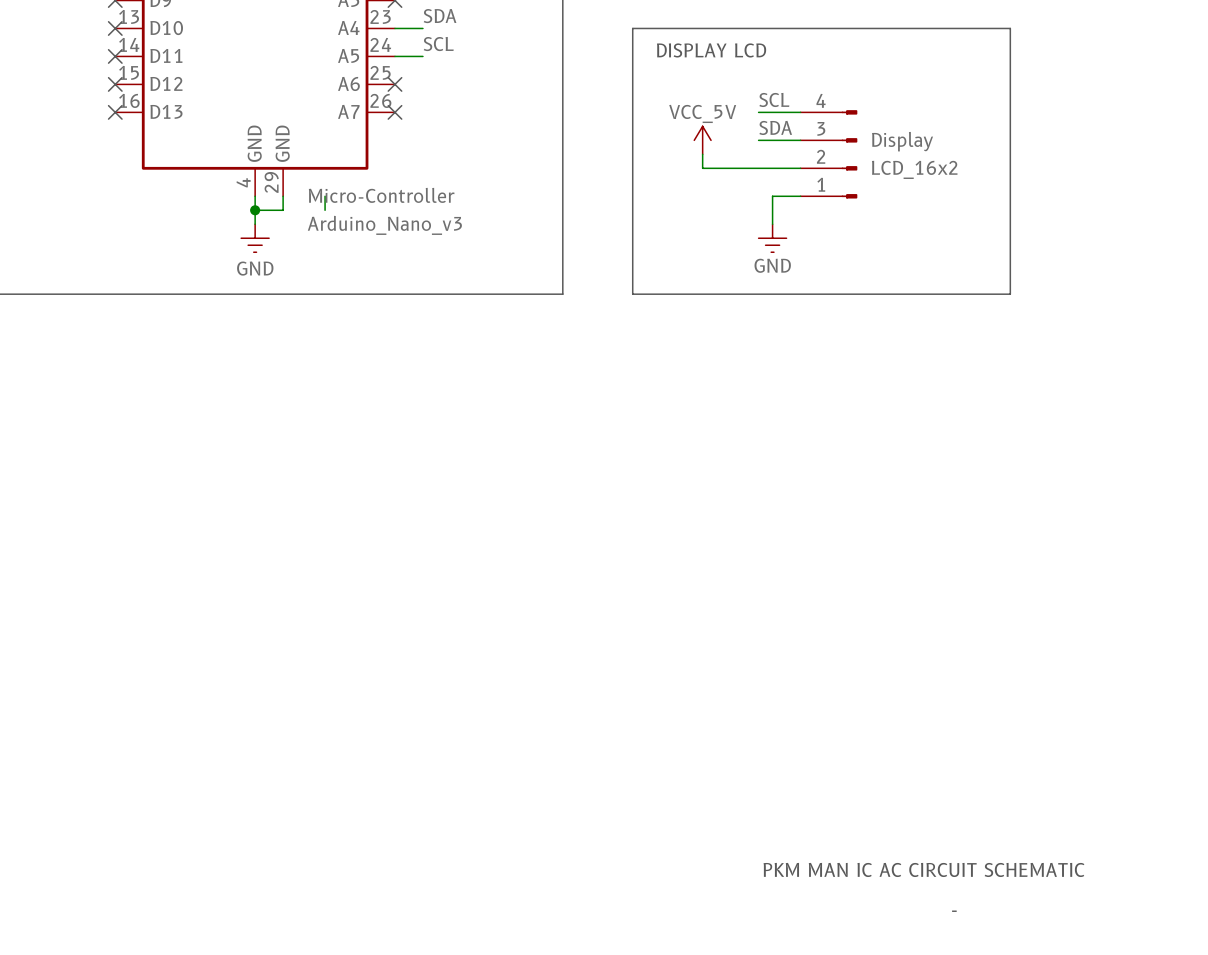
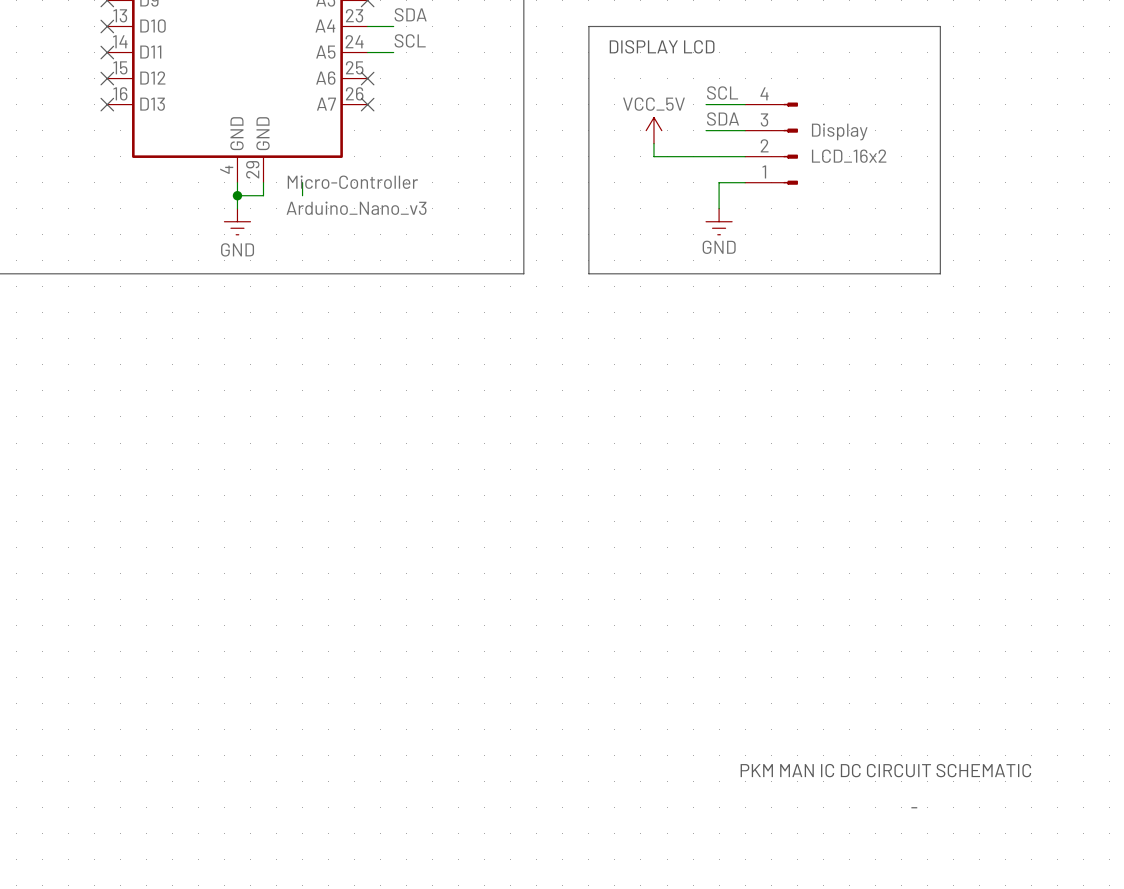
text: none -> PKM MAN IC DC CIRCUIT SCHEMATIC (885, 770)
text: PKM MAN IC AC CIRCUIT SCHEMATIC (923, 869) -> none
text position: - (954, 911) -> - (914, 807)

